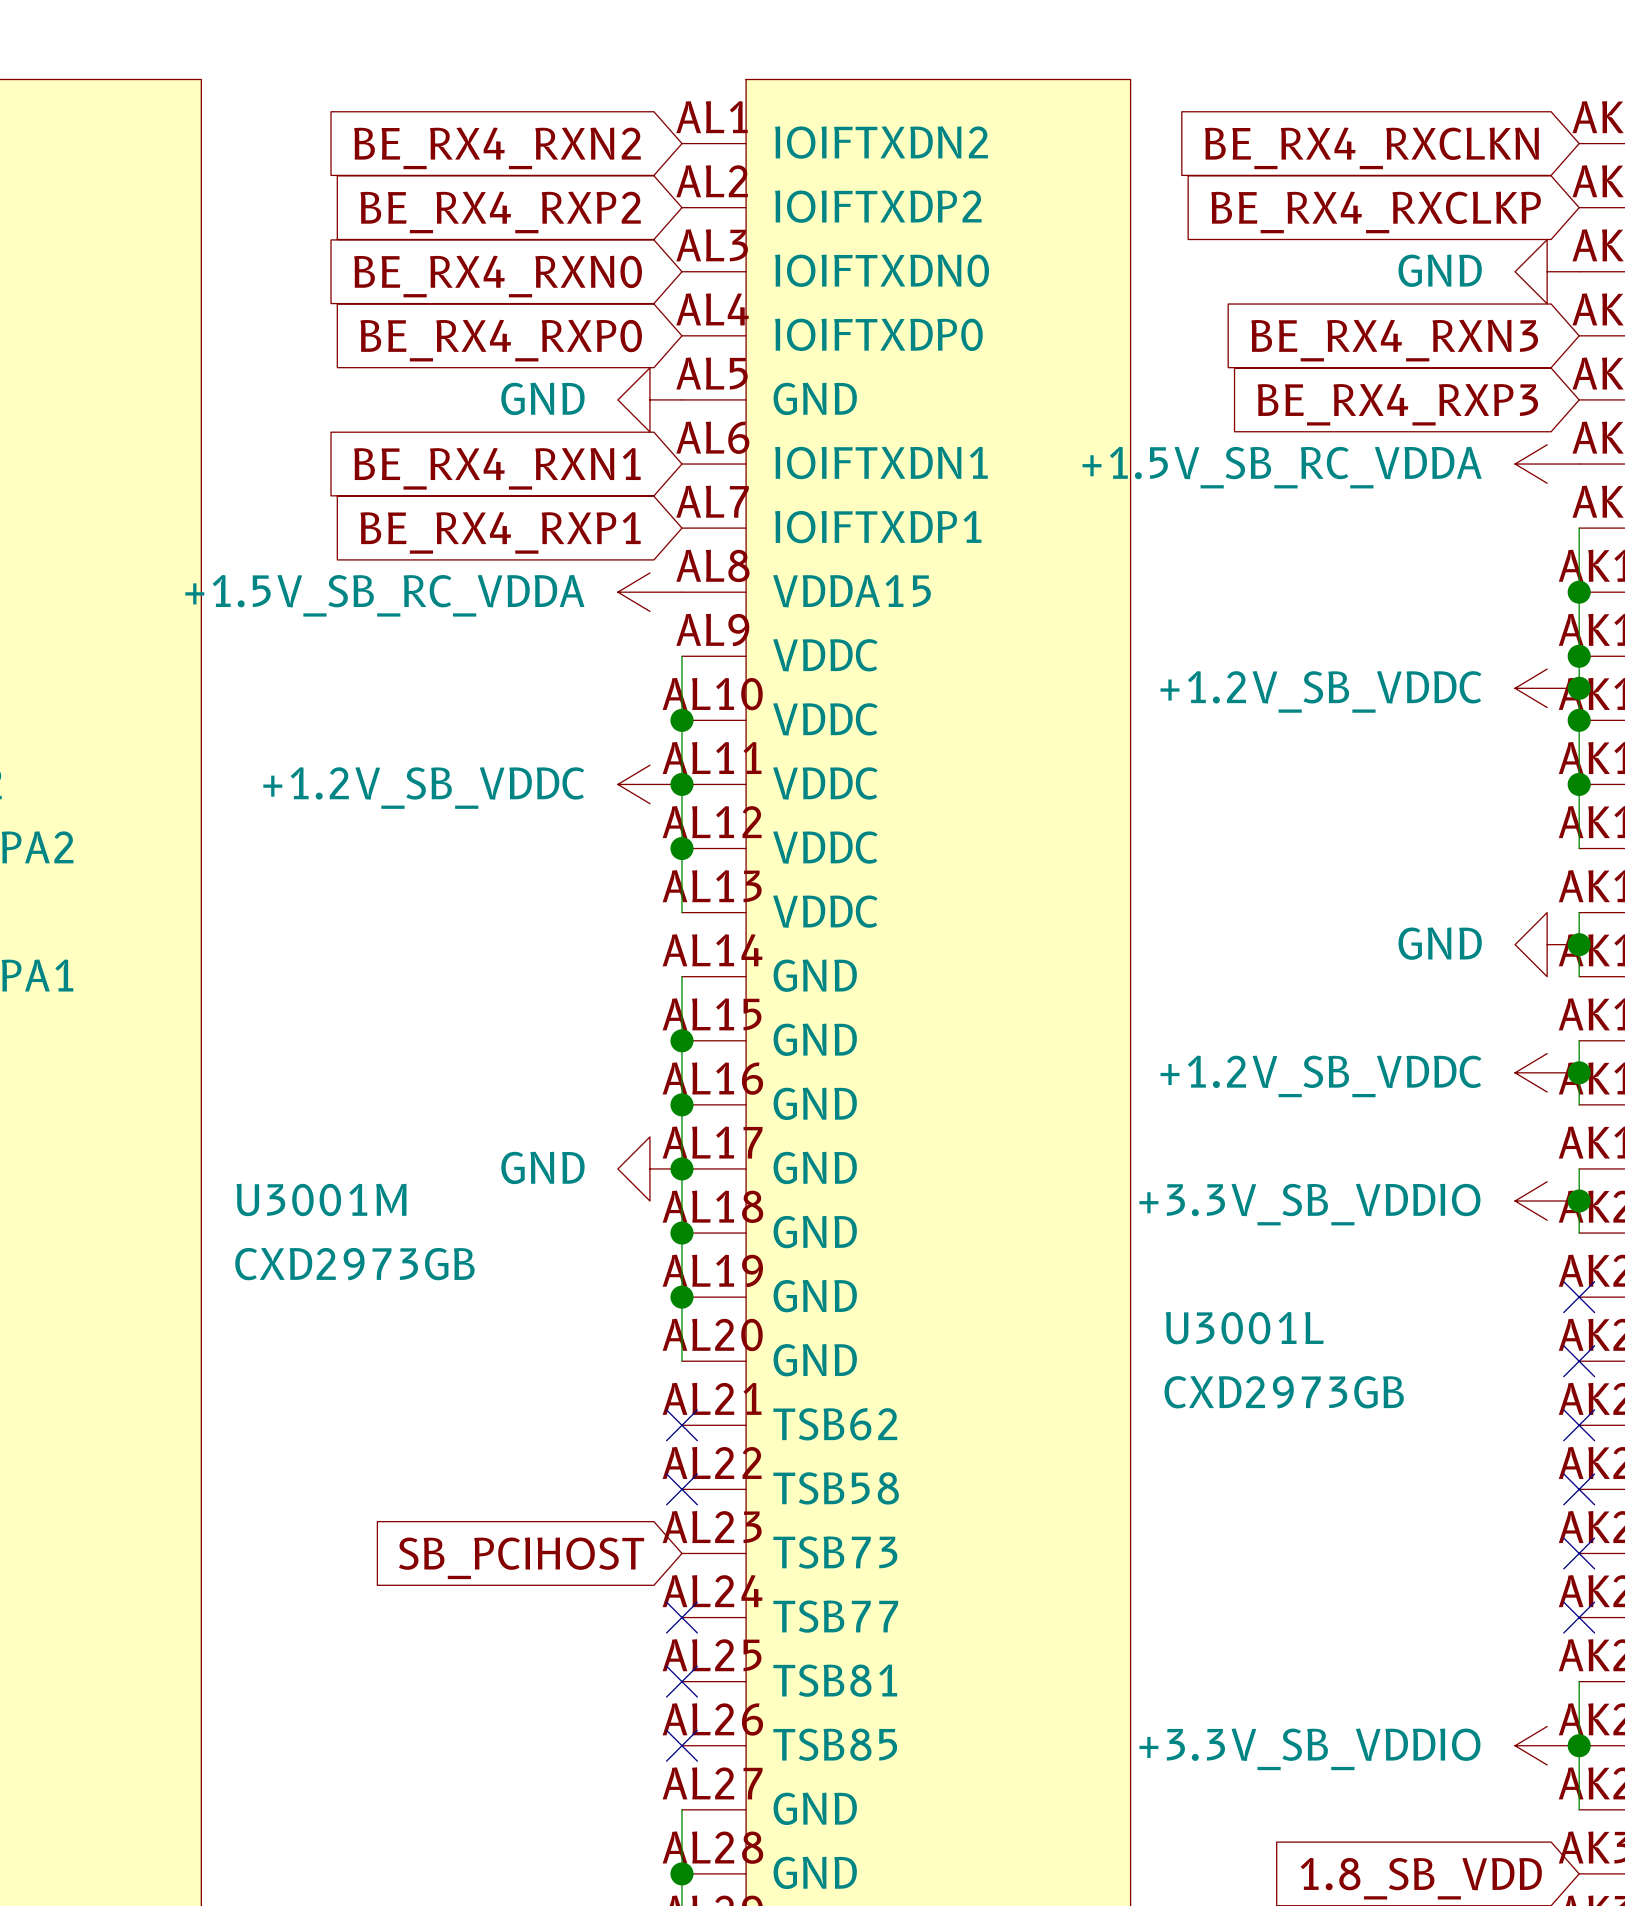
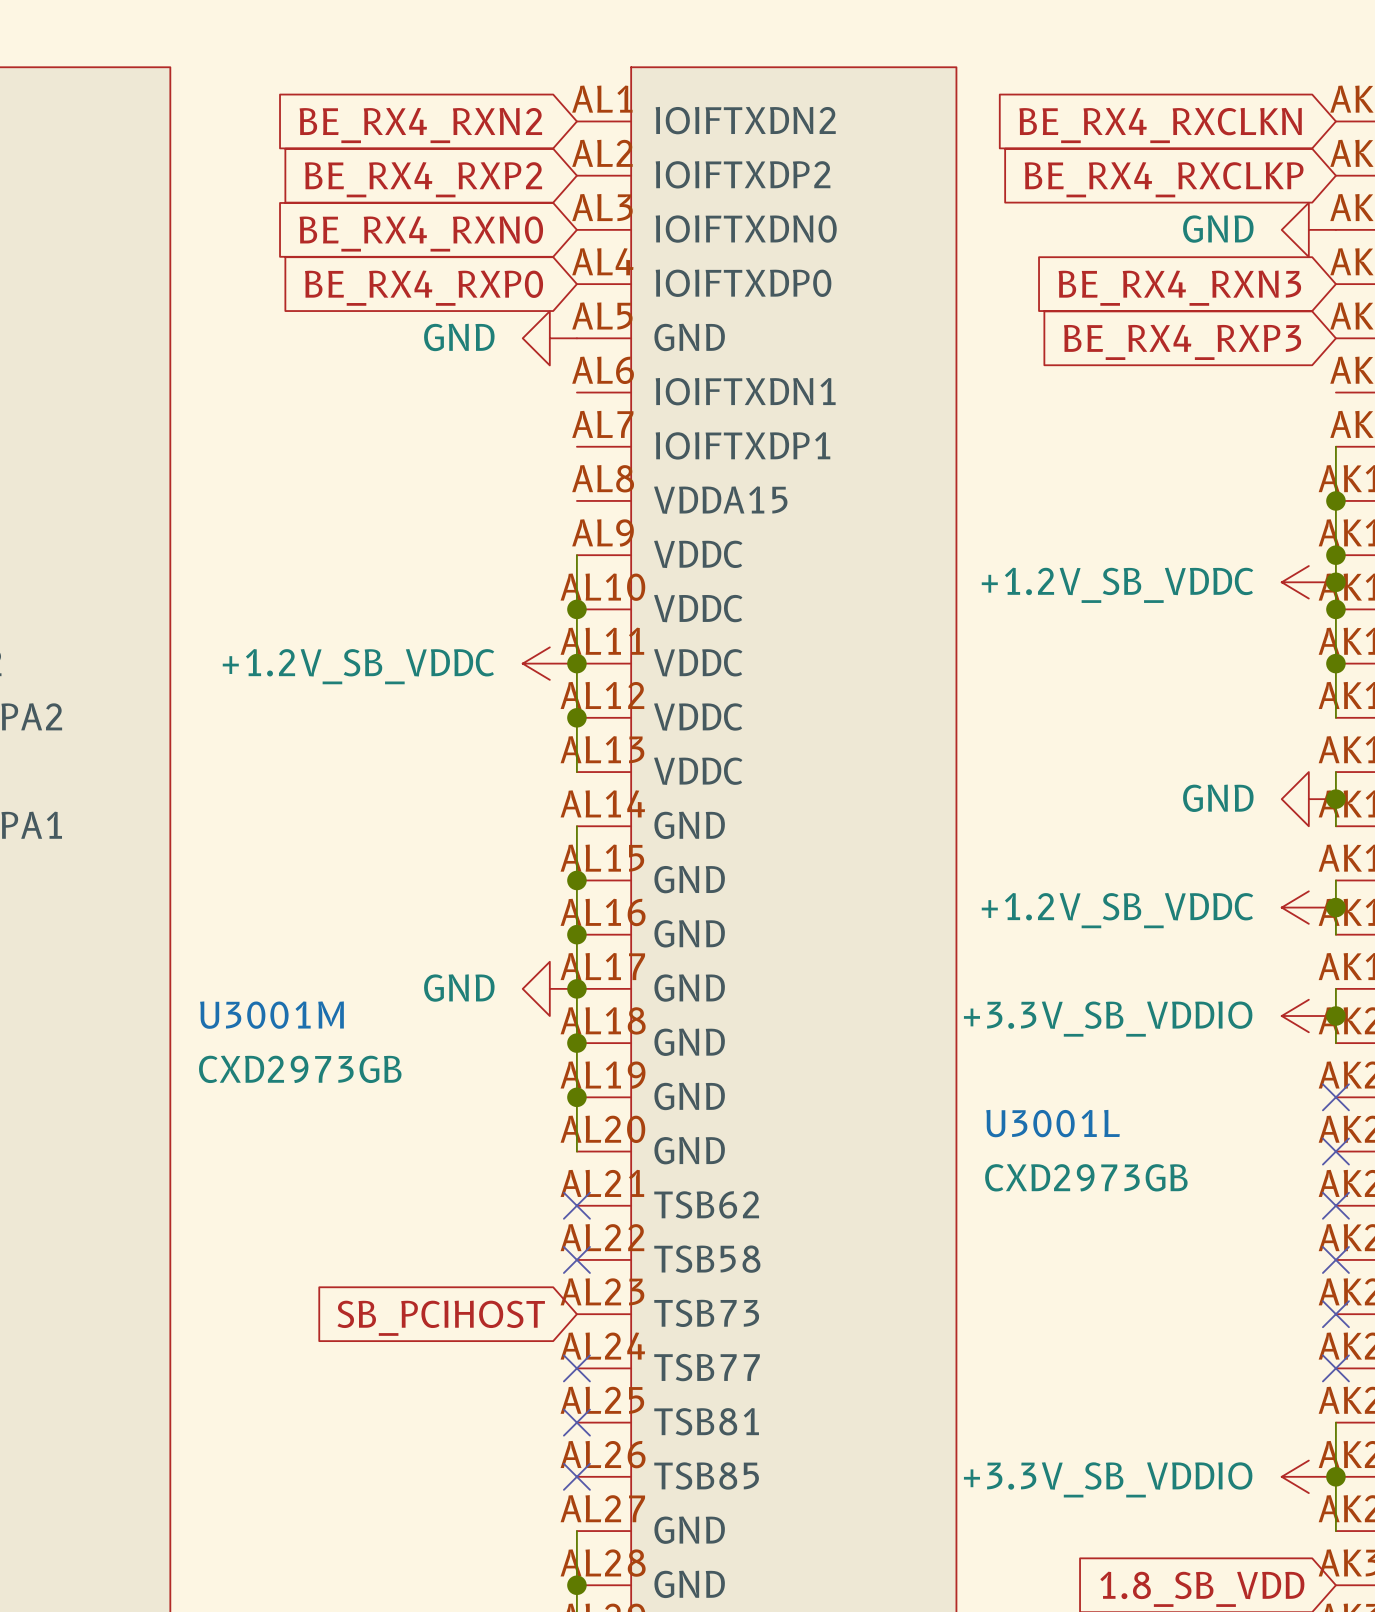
power symbol: +1.5V_SB_RC_VDDA (1547, 464) -> none
global label: BE_RX4_RXN1 (497, 468) -> none
global label: BE_RX4_RXP1 (500, 532) -> none
power symbol: +1.5V_SB_RC_VDDA (649, 592) -> none

